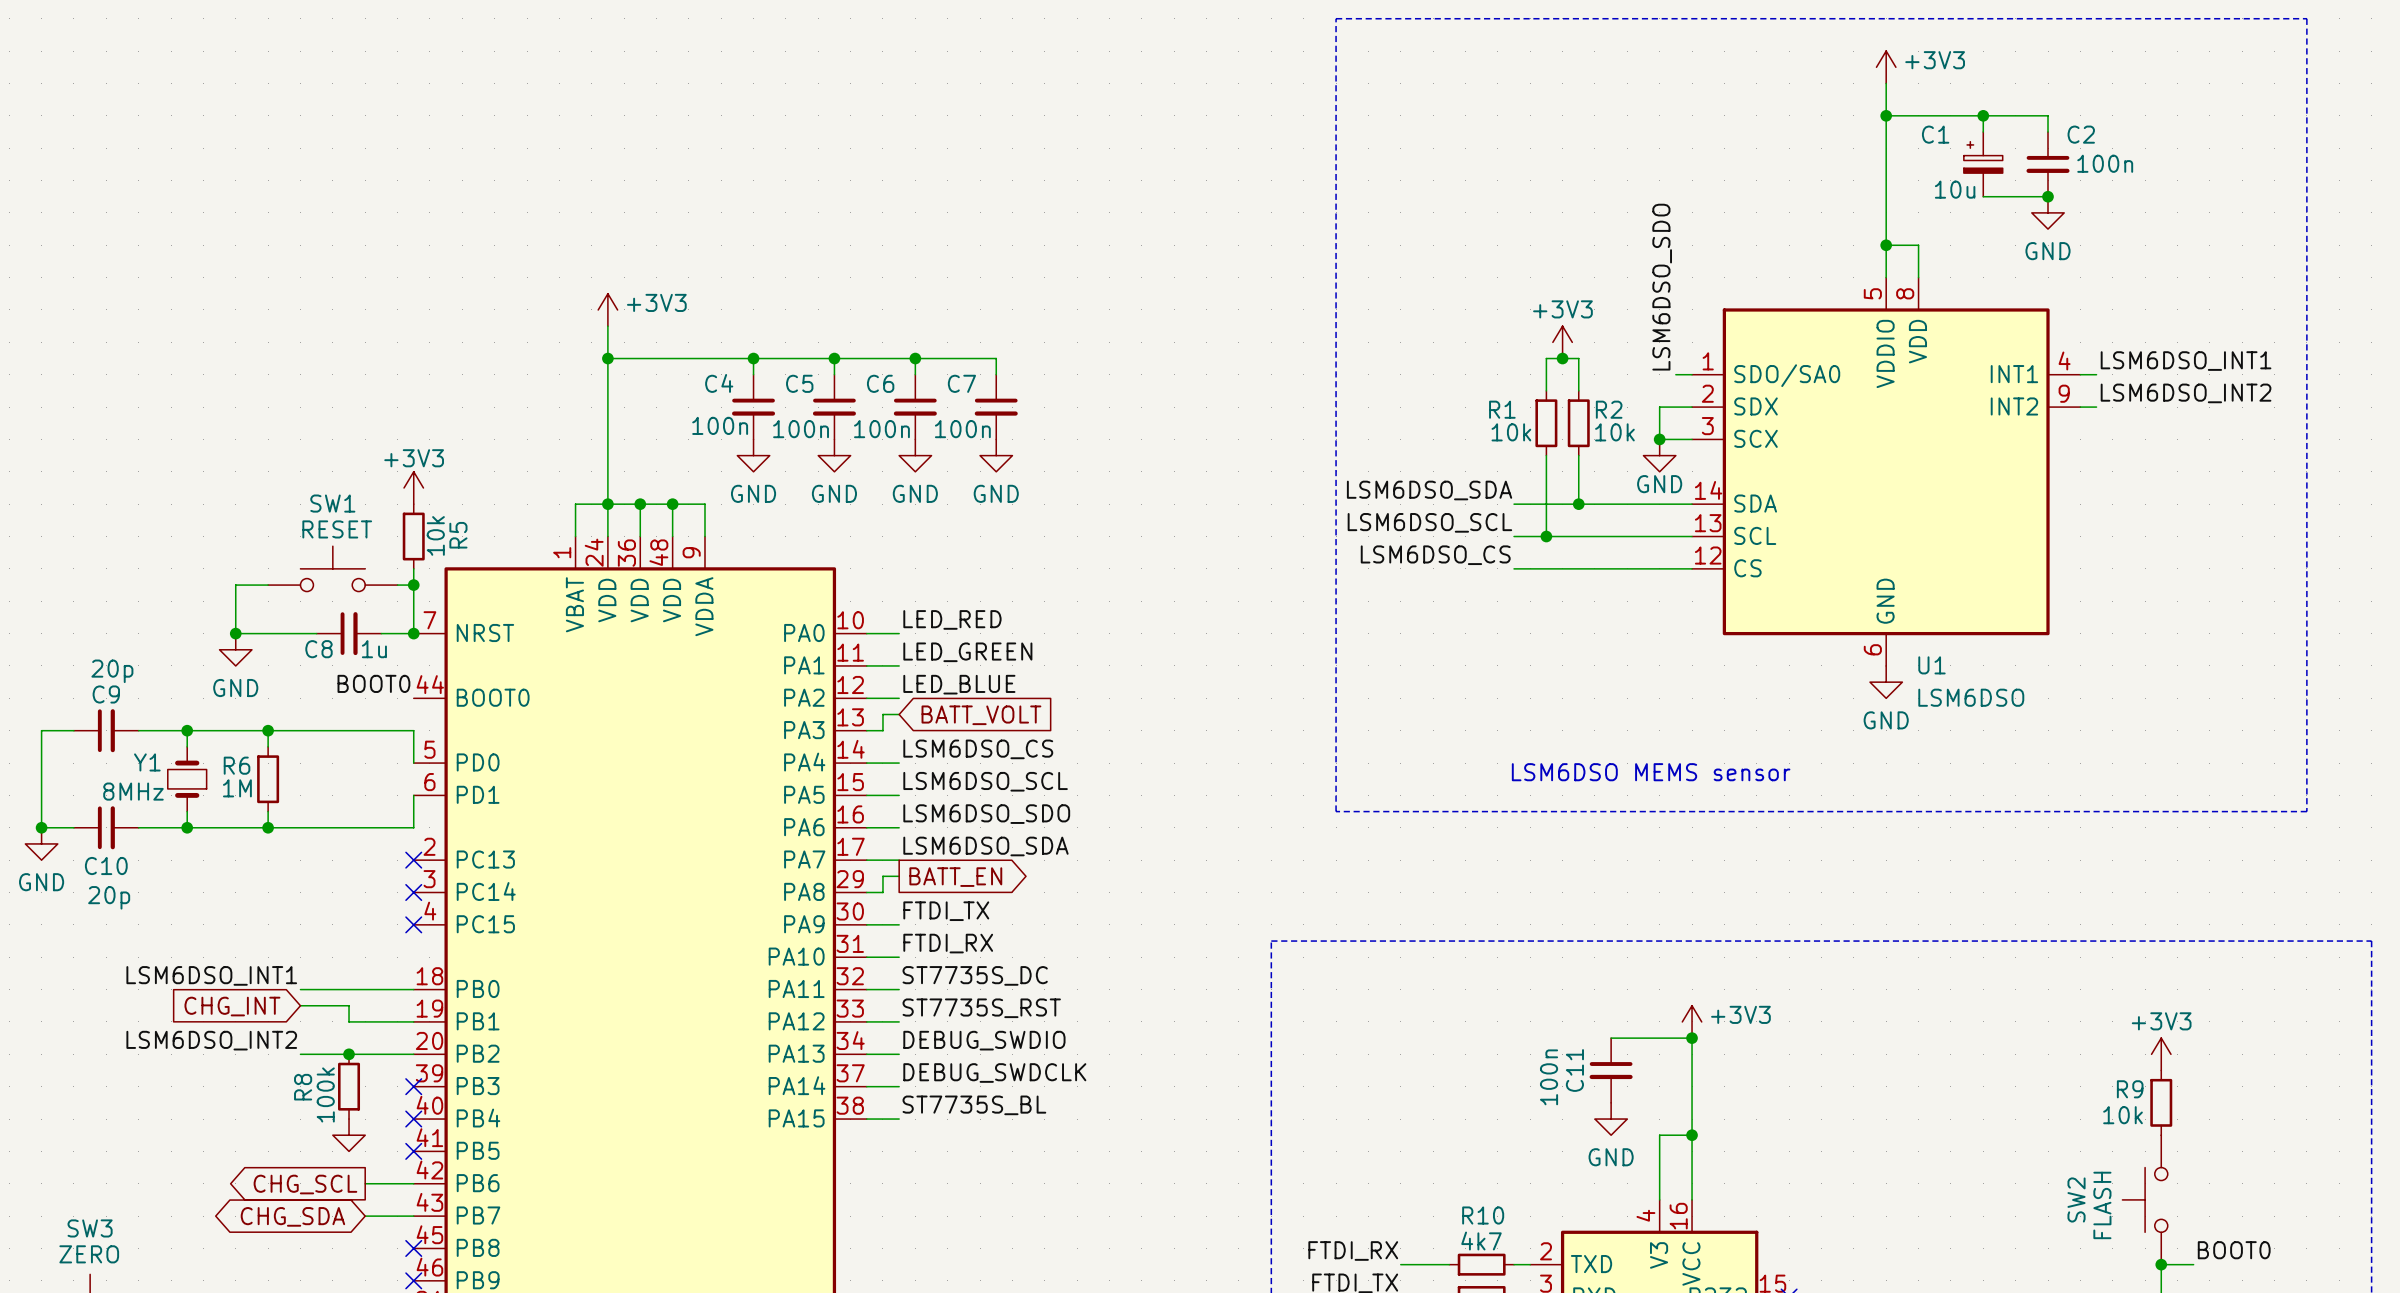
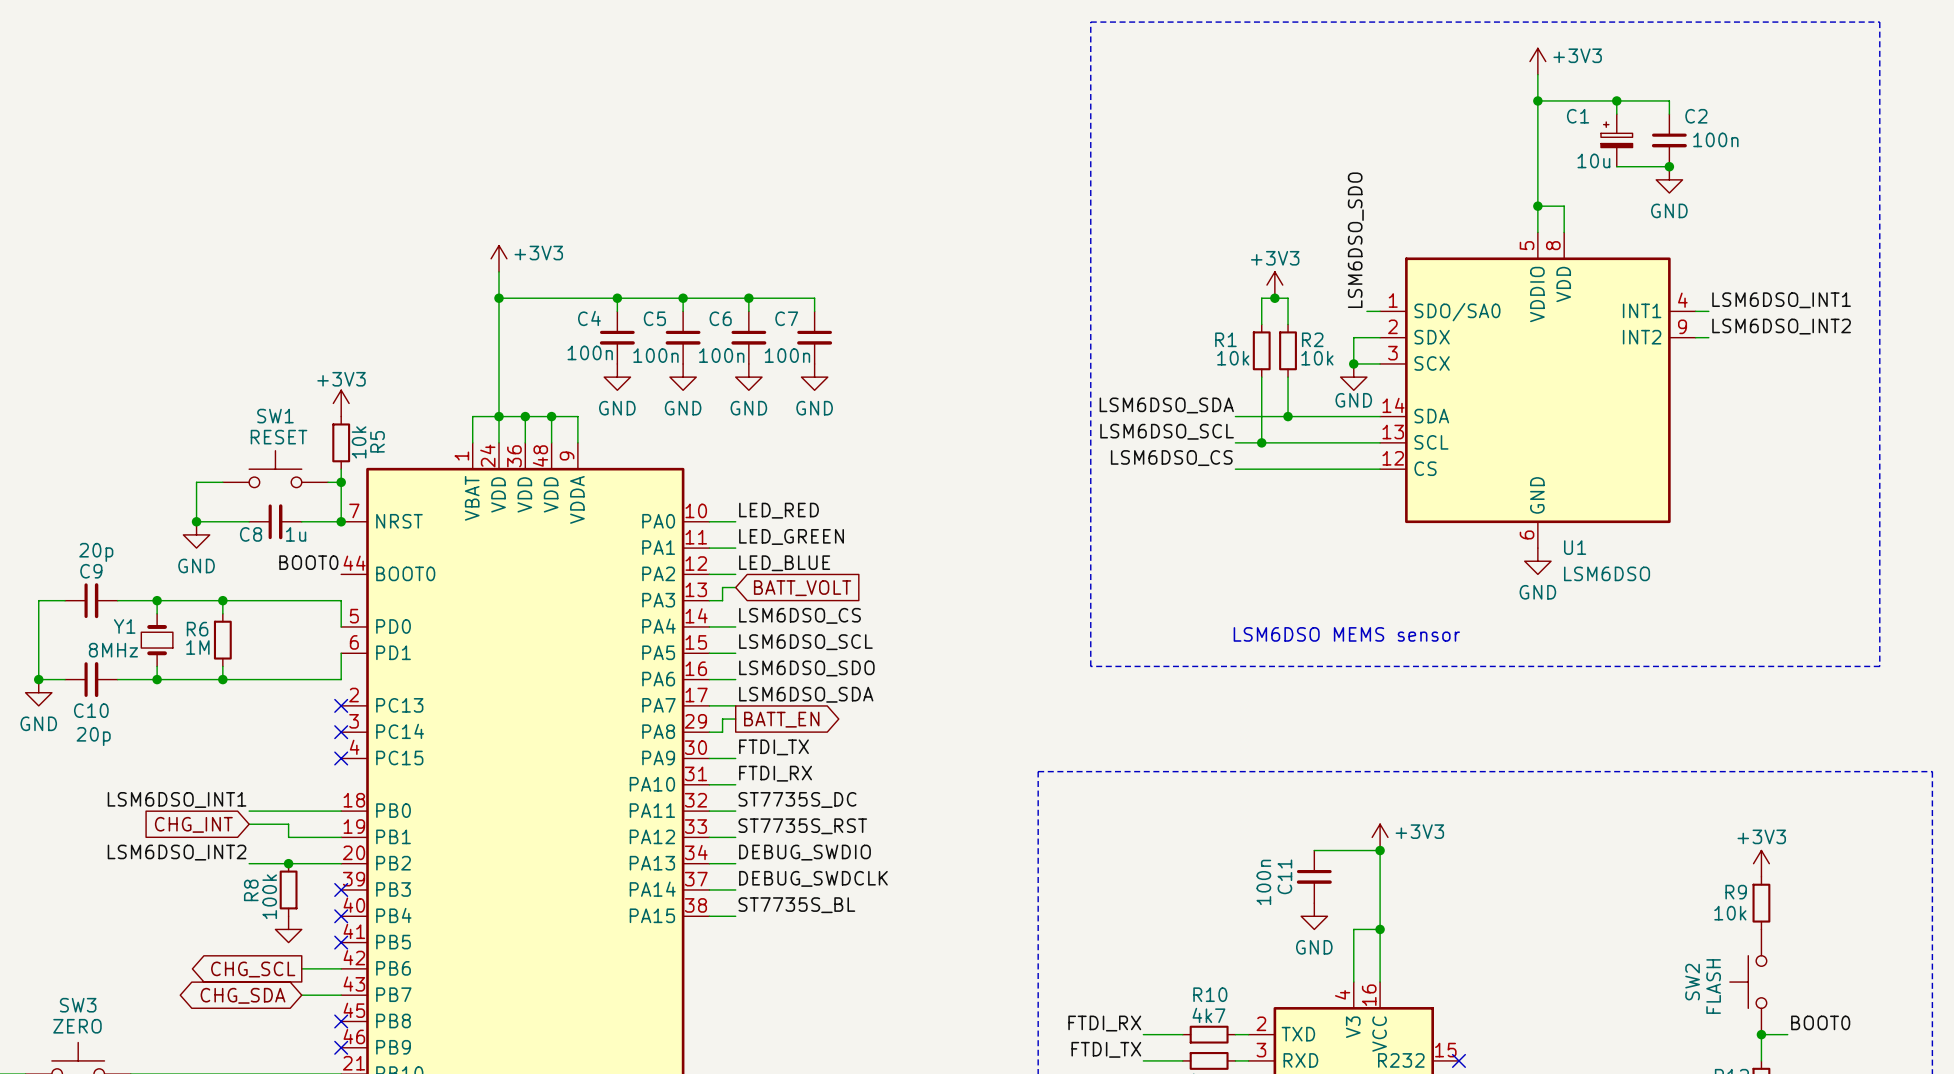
C8 position: (349, 633) -> (275, 521)

